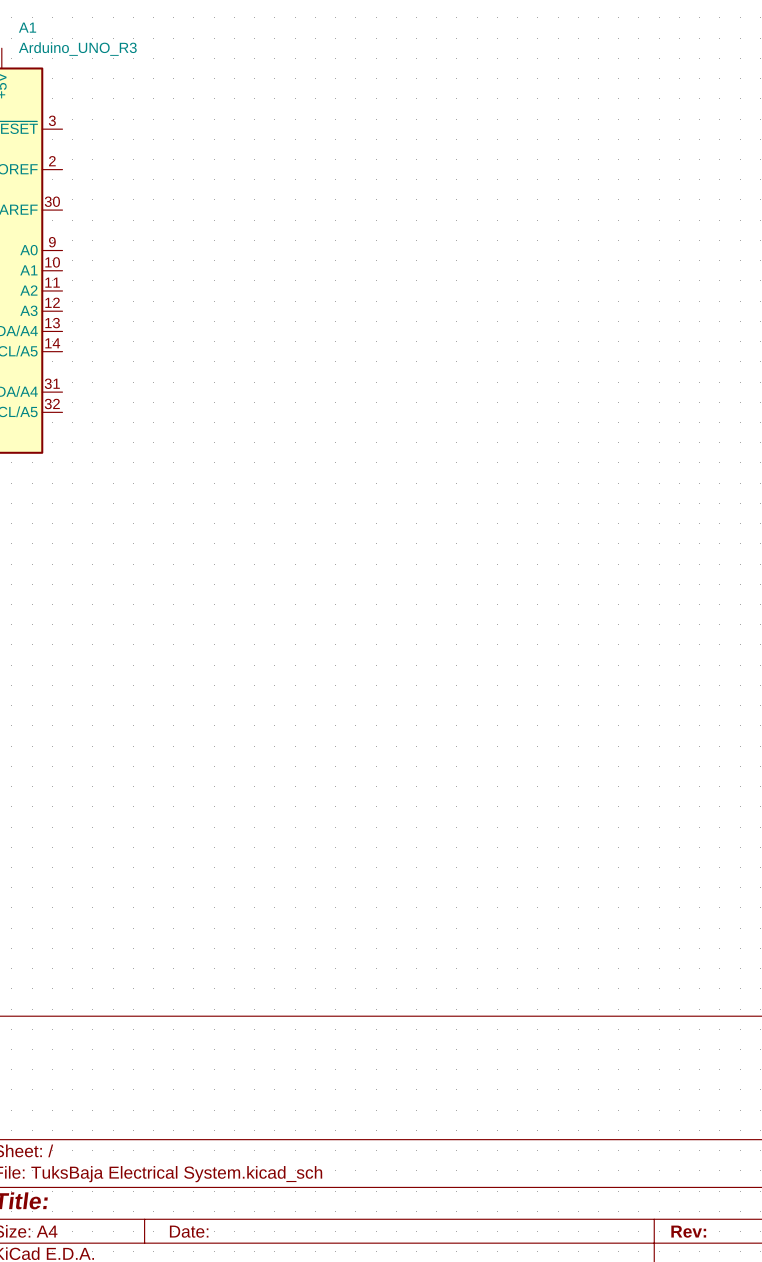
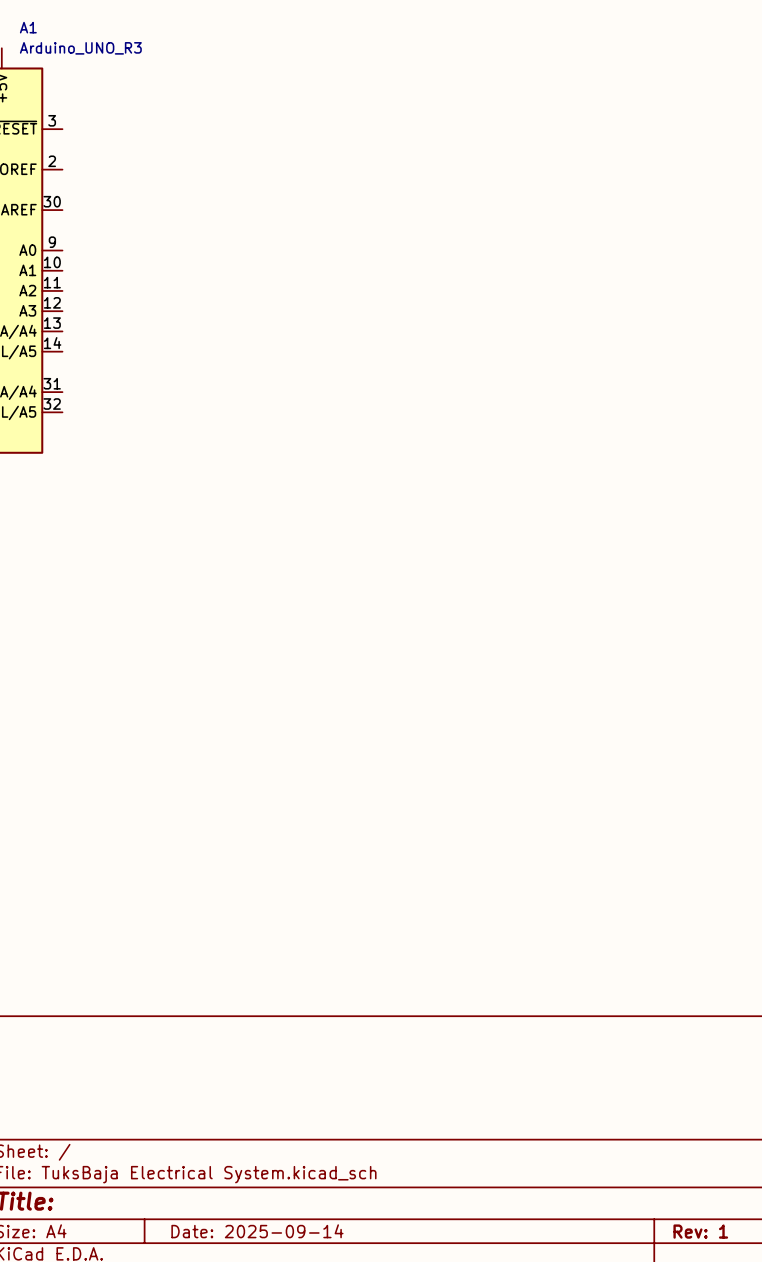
title block: Date: (189, 1231) -> Date: 2025-09-14 (257, 1231)
title block: Rev: (688, 1231) -> Rev: 1 (700, 1231)

